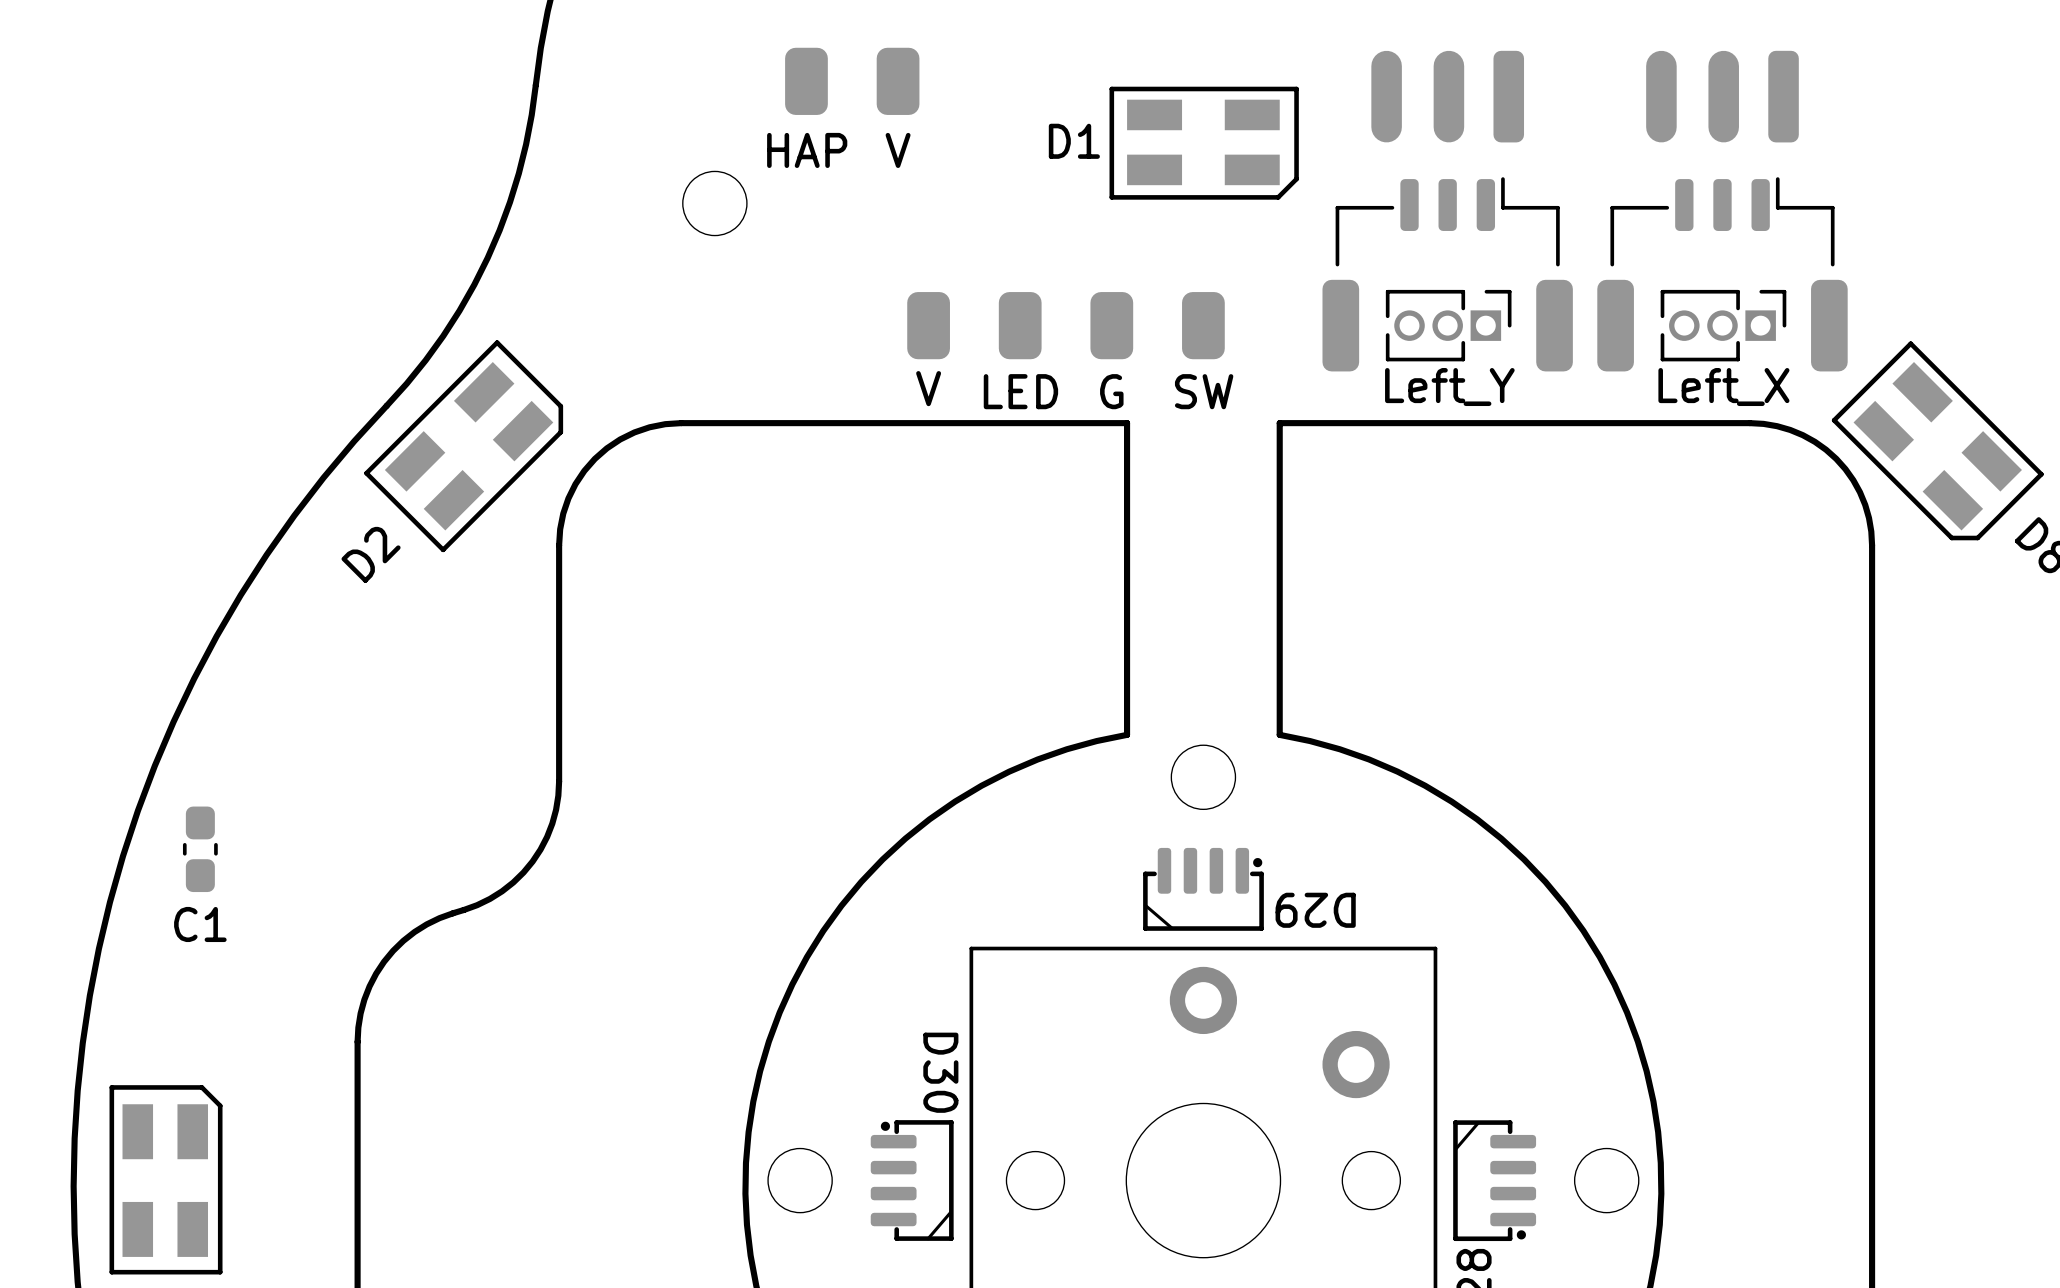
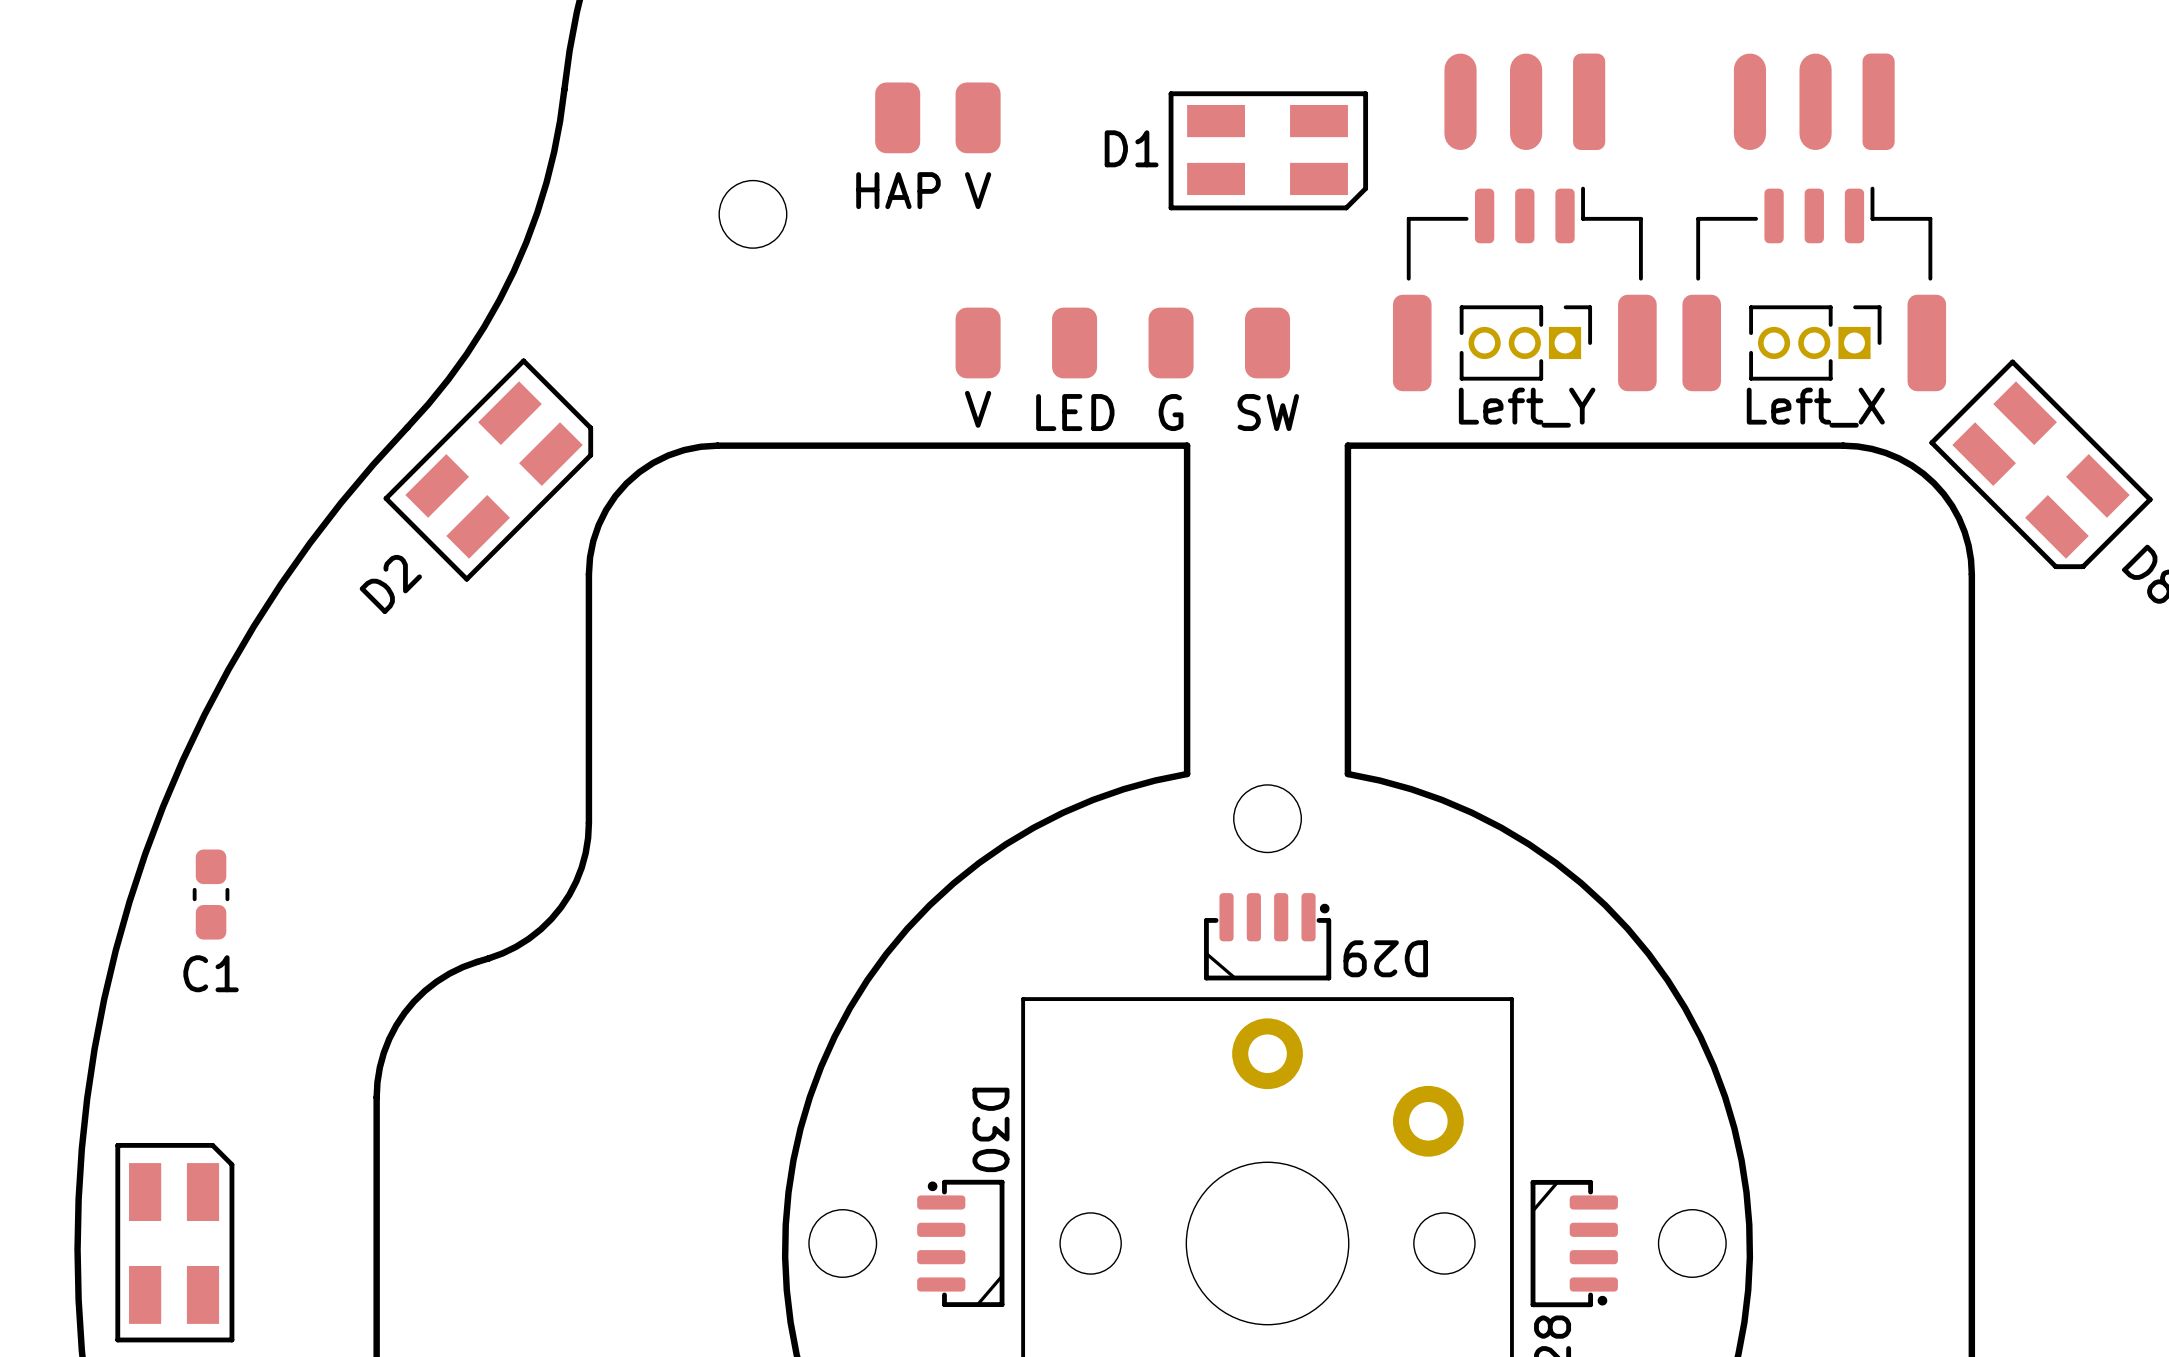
part position: (806, 81) -> (897, 117)
part position: (898, 81) -> (978, 117)

